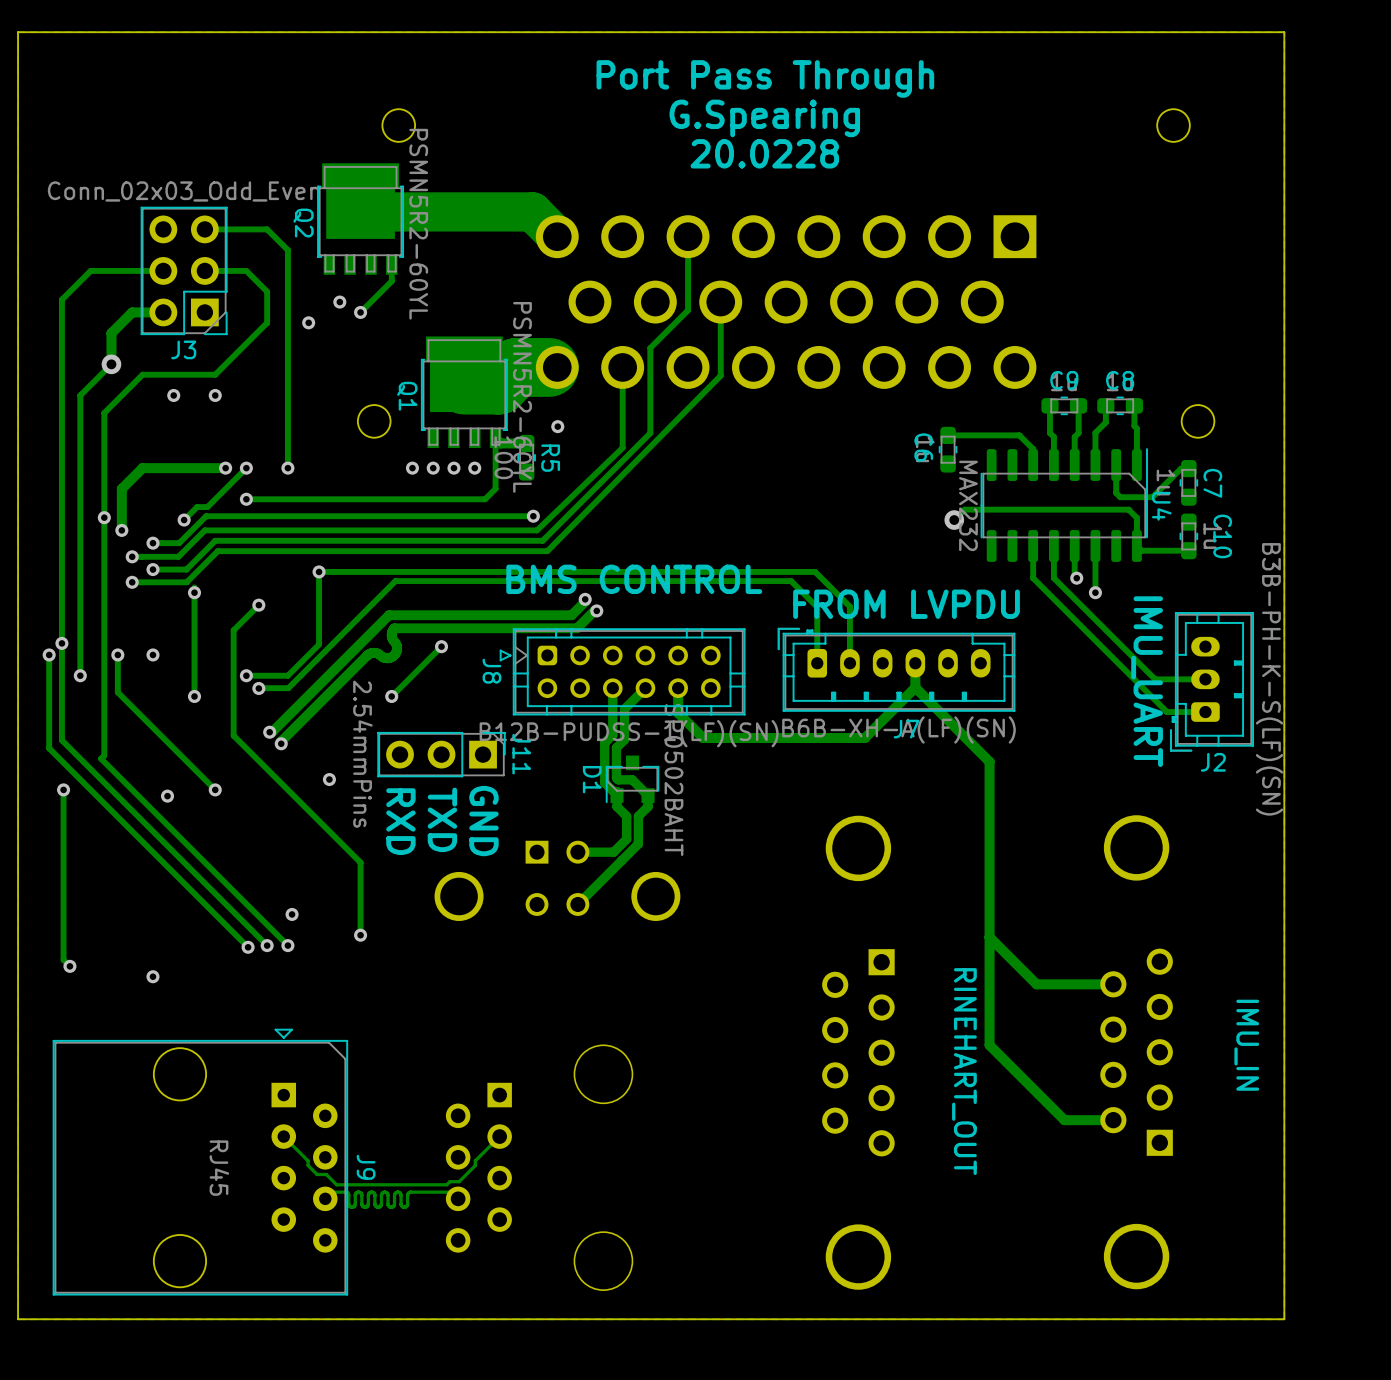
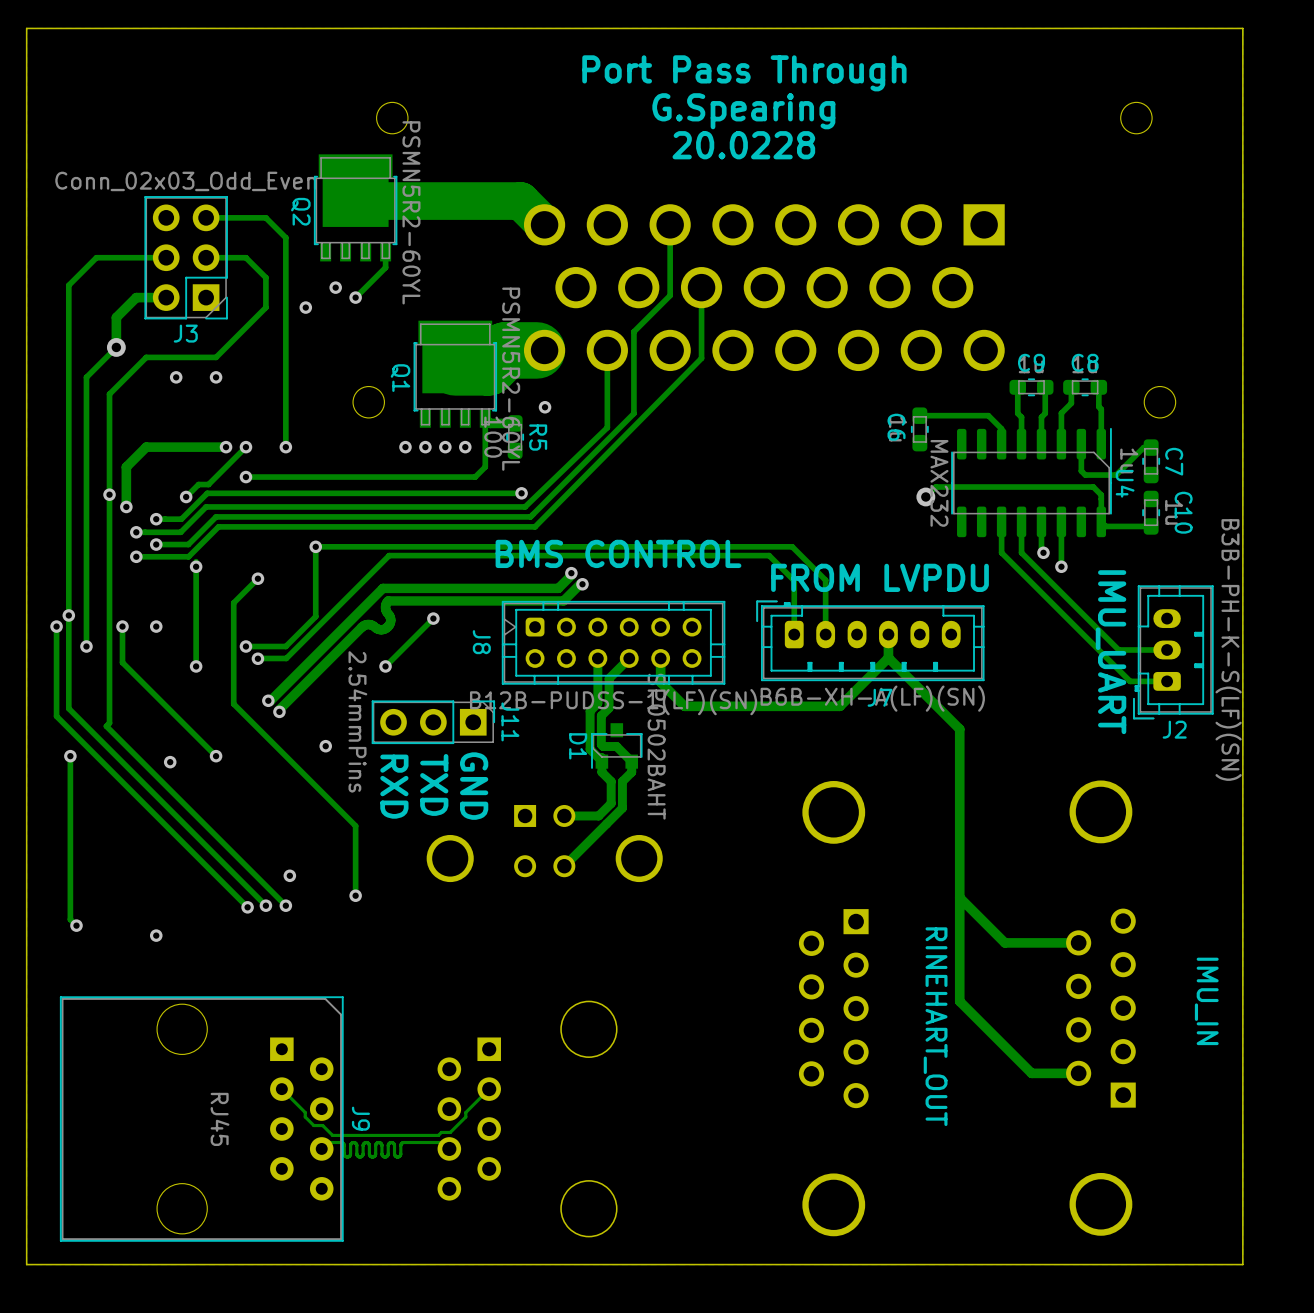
J8 footprint: [499, 628, 746, 716] -> [501, 600, 726, 685]
J9 footprint: [52, 1028, 349, 1296] -> [59, 996, 344, 1242]

